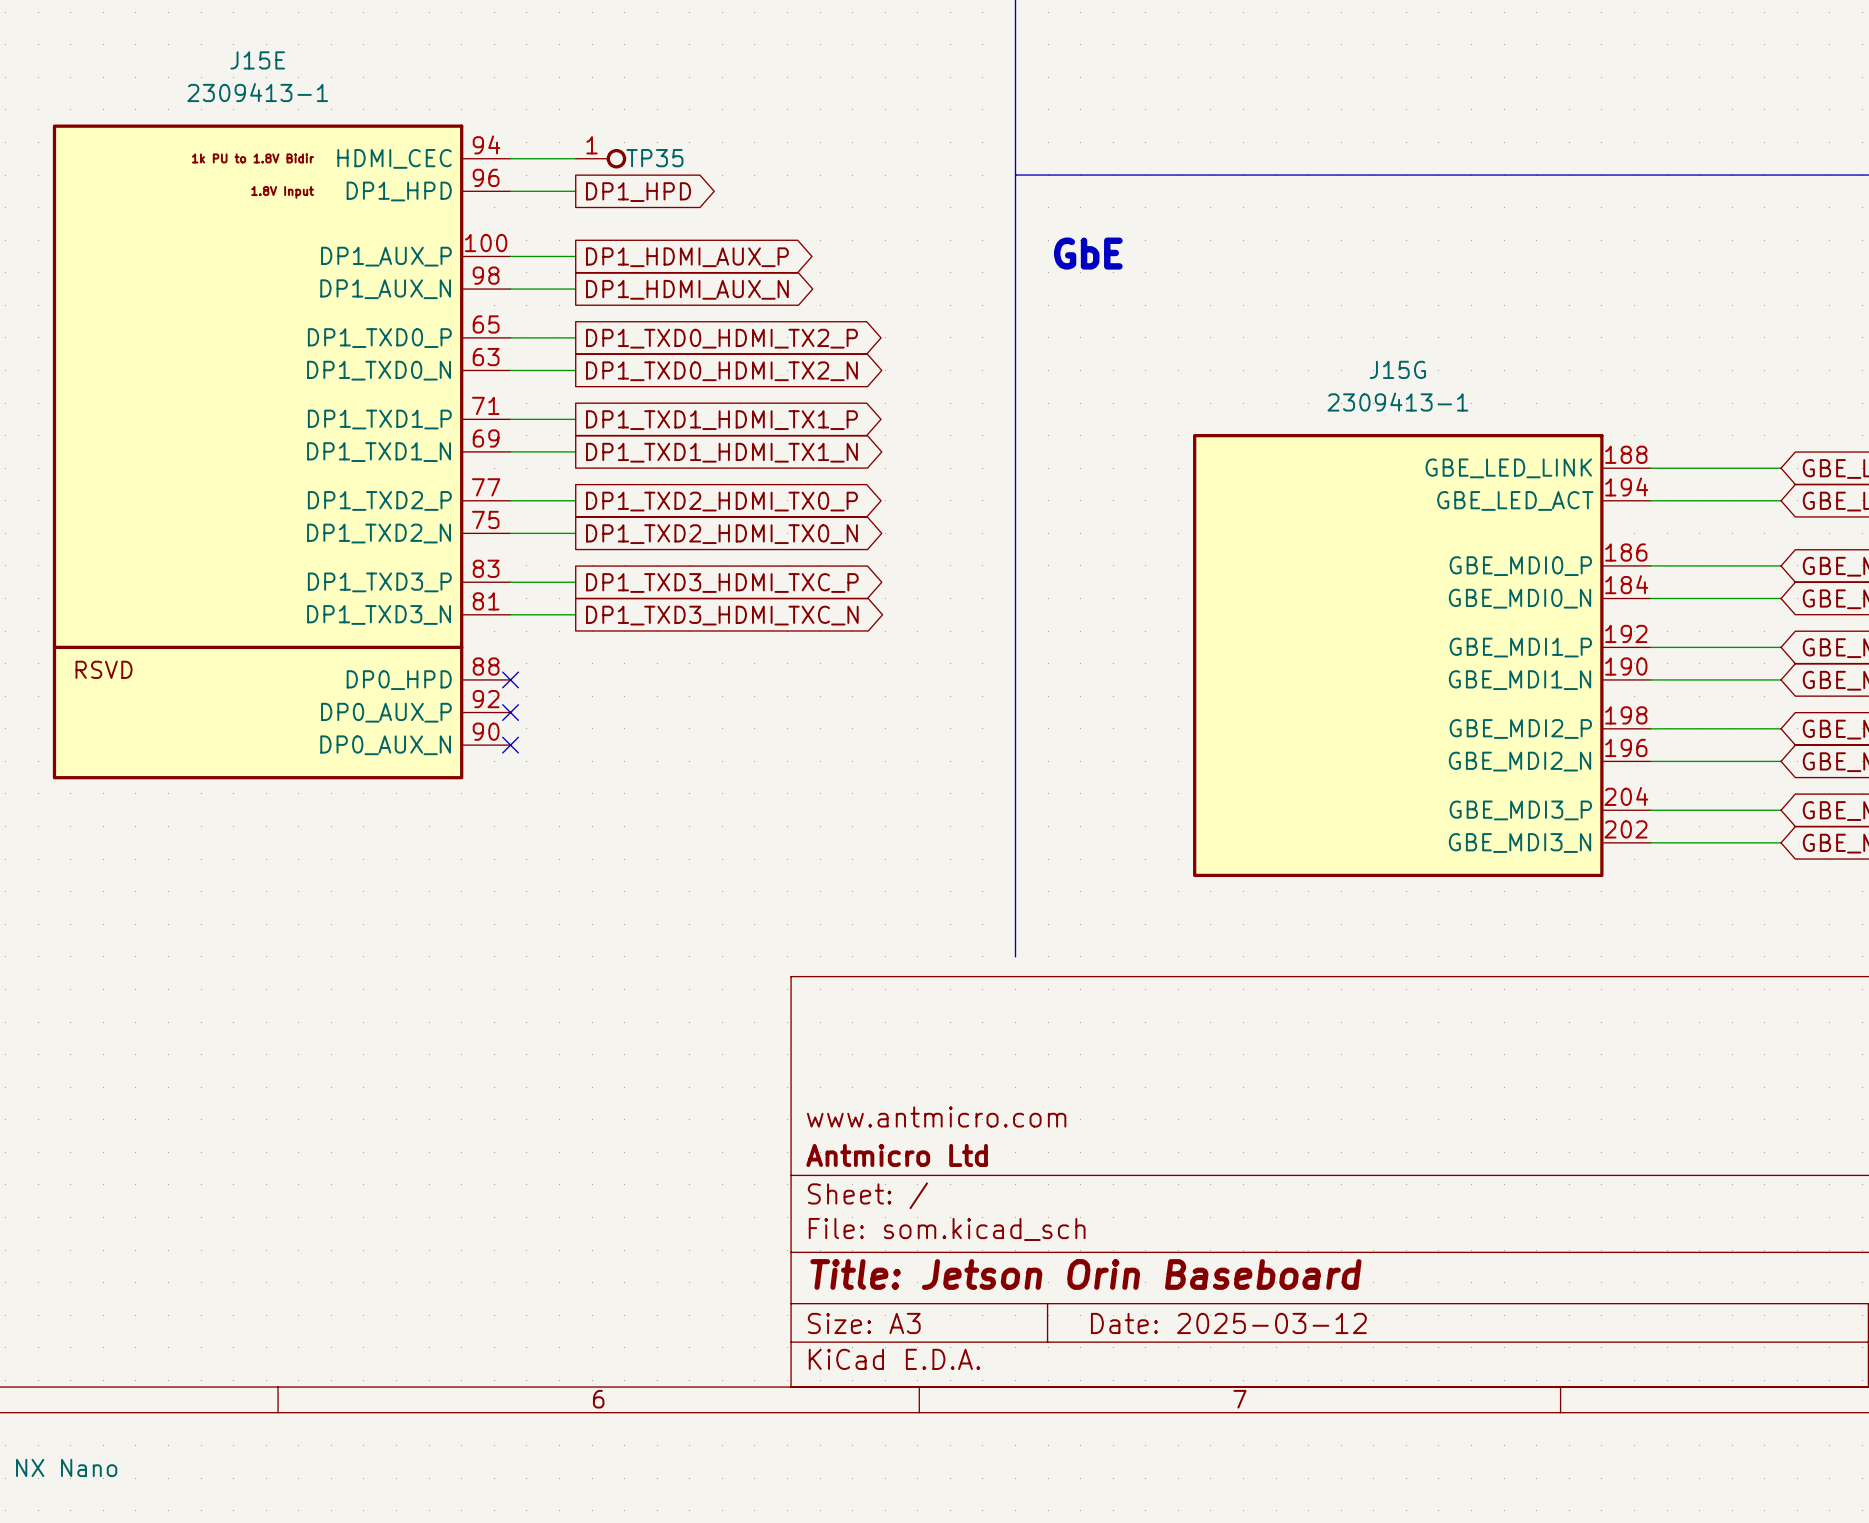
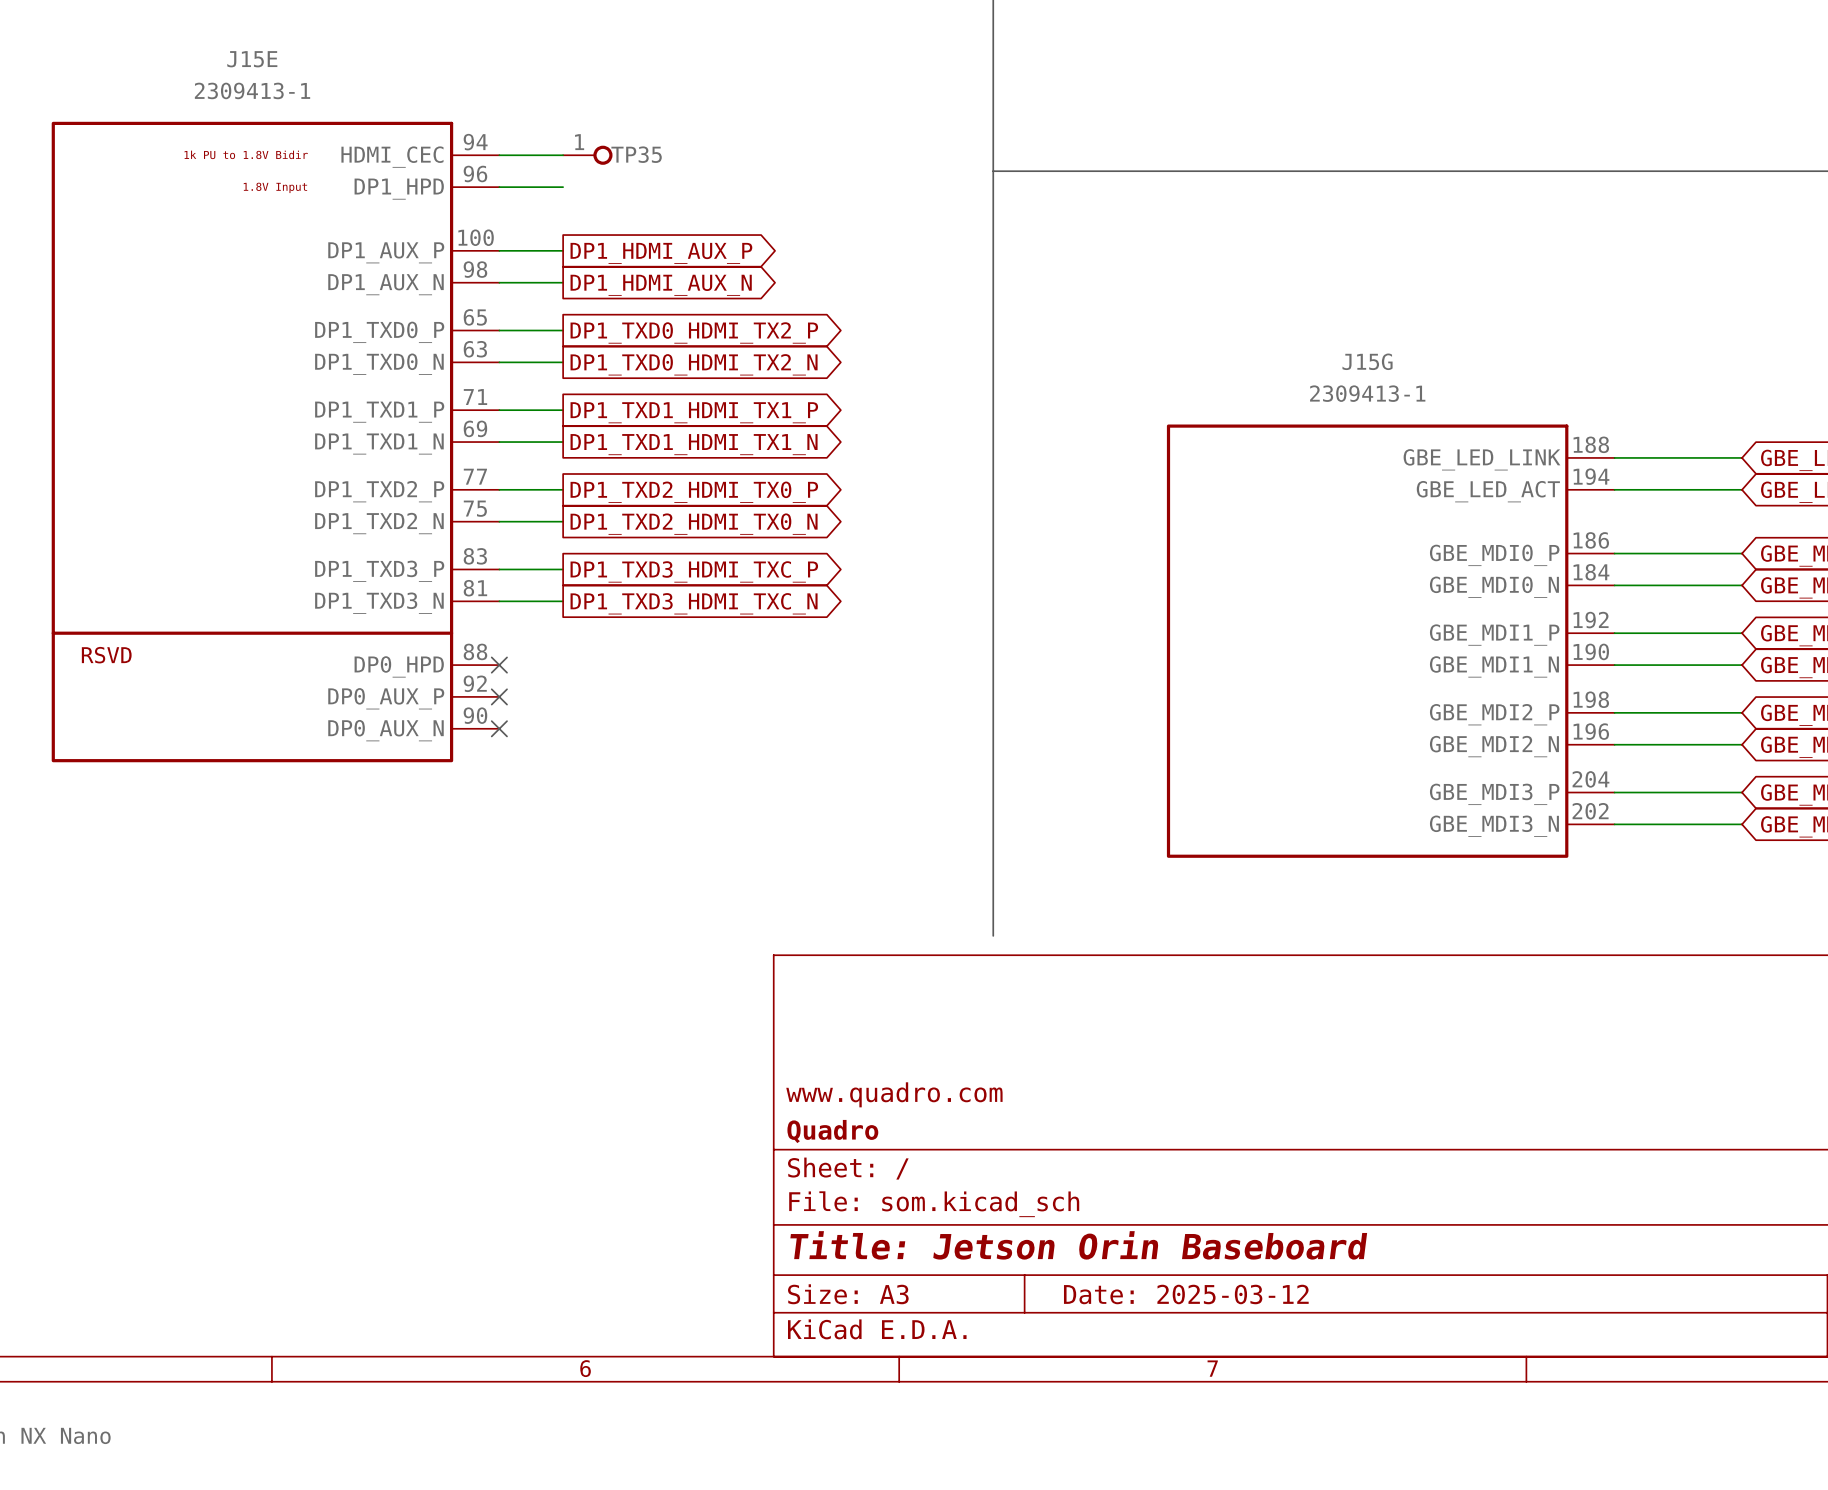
global label: DP1_HPD (638, 192) -> none
text: GbE (1088, 253) -> none
title block: www.antmicro.com (936, 1116) -> www.quadro.com (894, 1094)
title block: Antmicro Ltd (897, 1155) -> Quadro (832, 1131)

